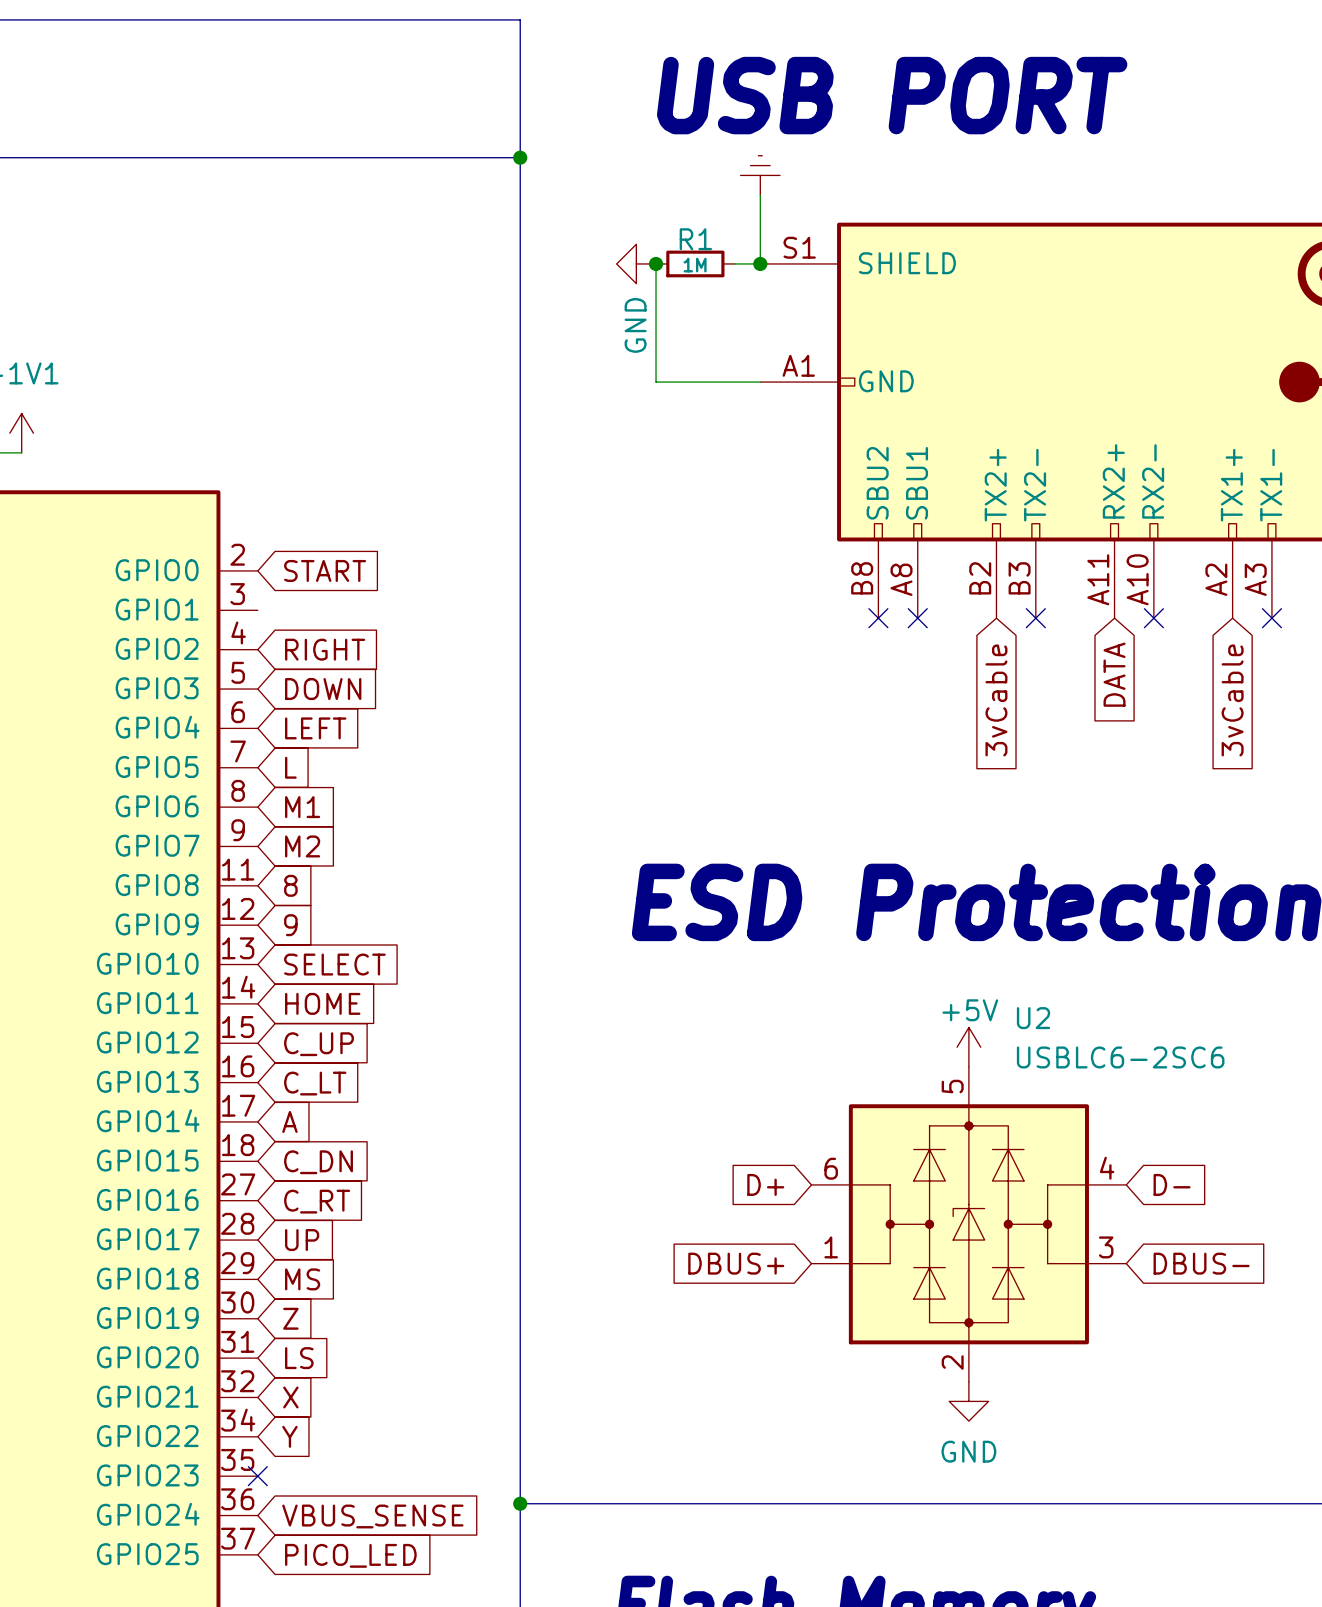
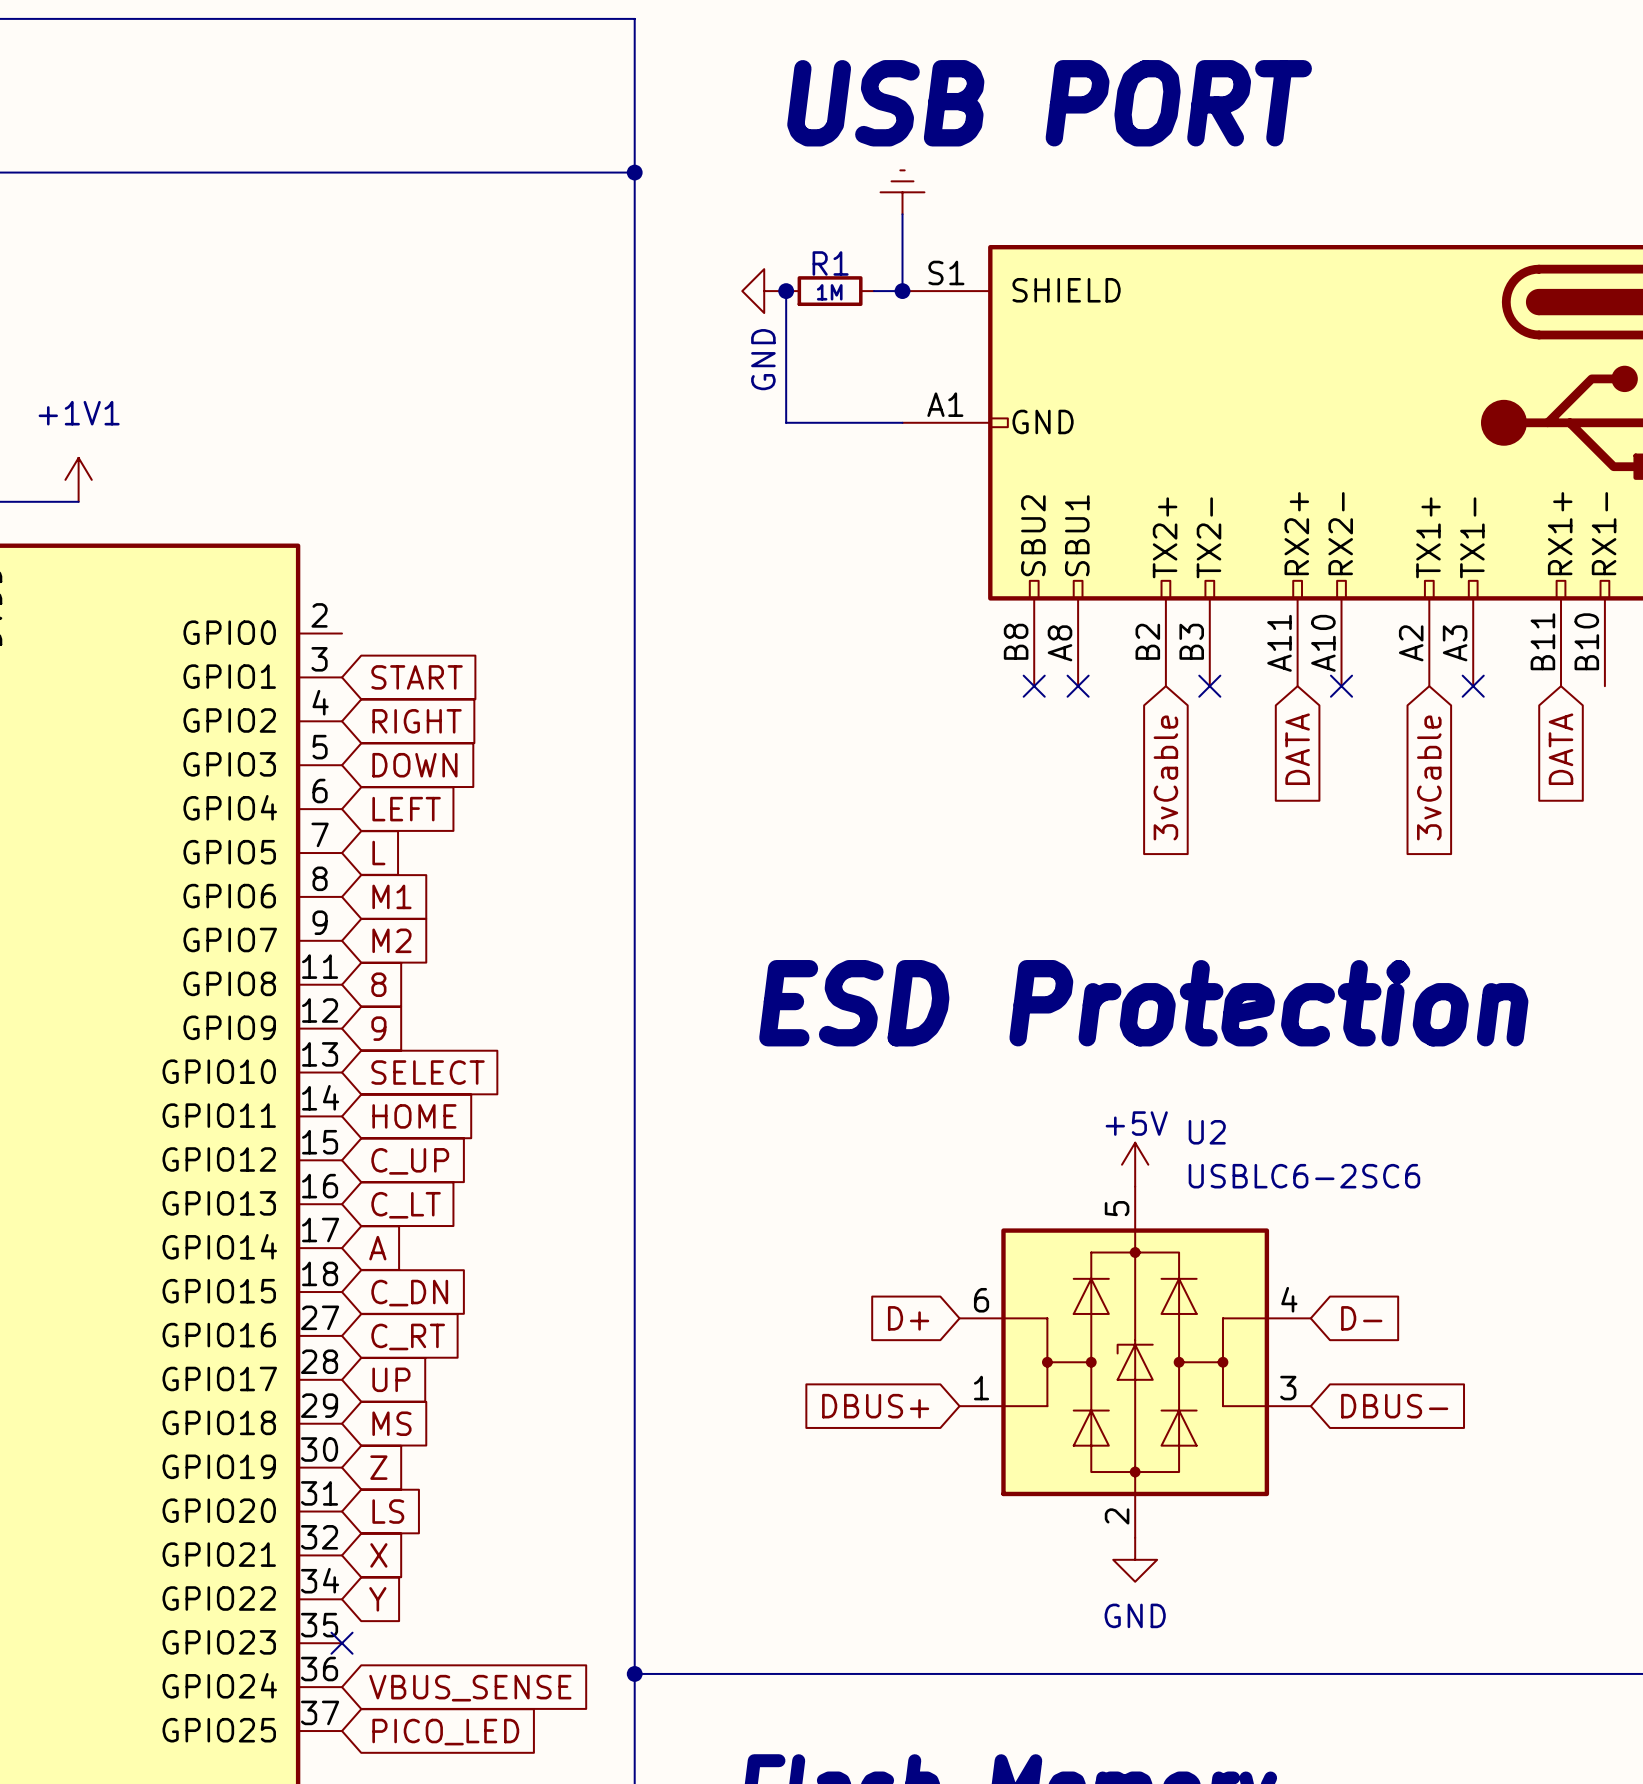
global label position: START (325, 570) -> START (417, 677)

